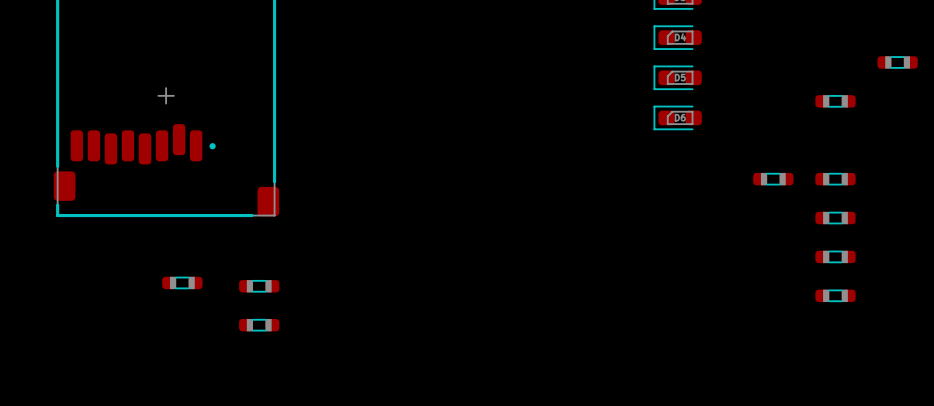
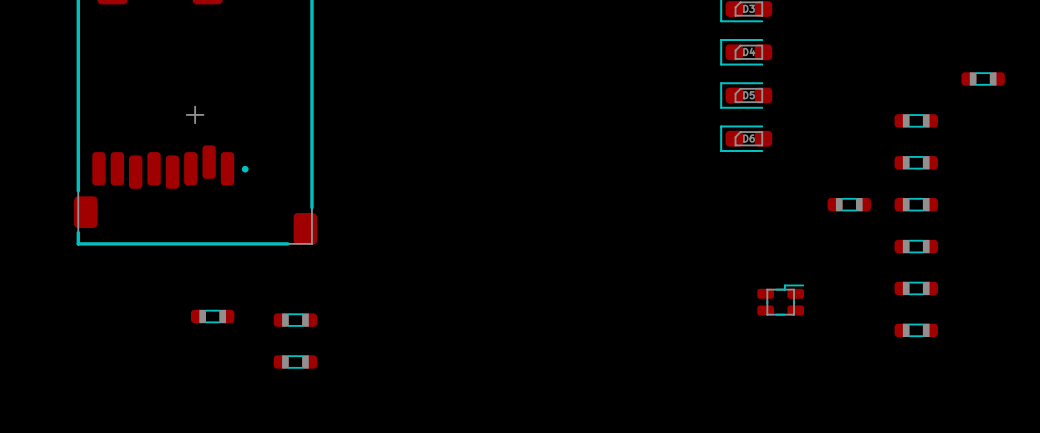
part: none -> (916, 162)
part: none -> (780, 300)

